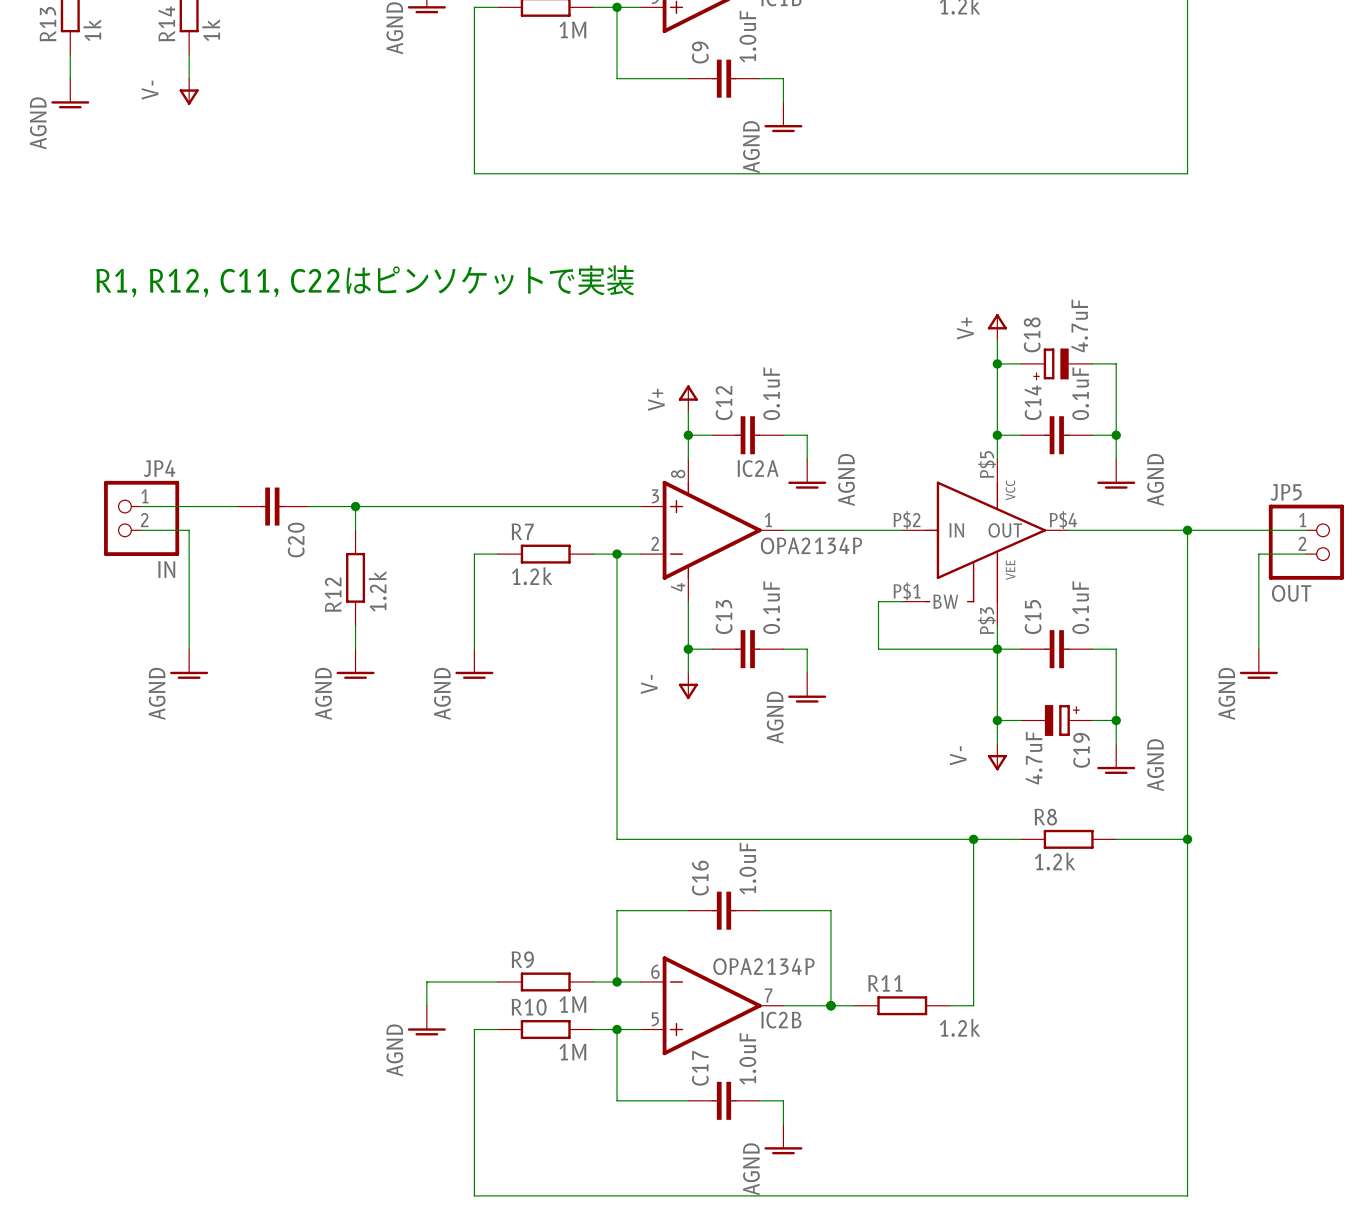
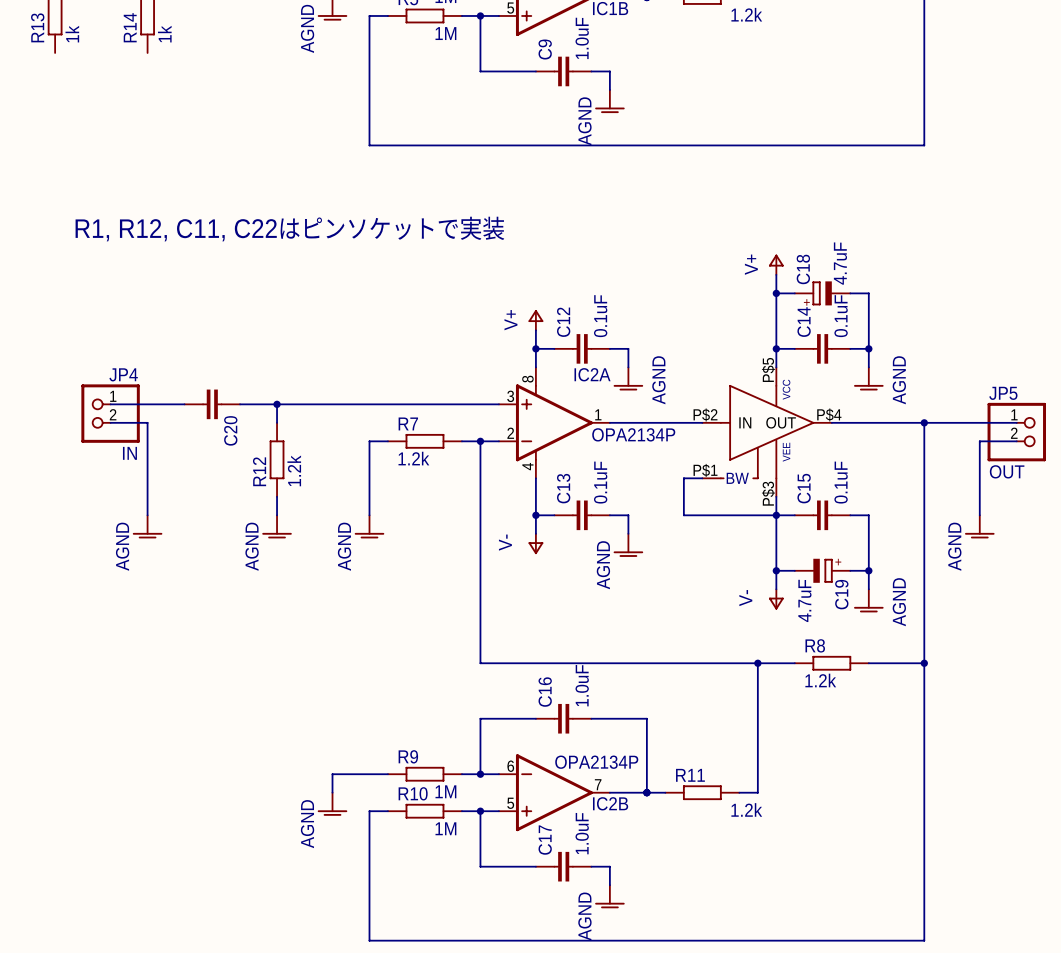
wire: (70, 54) (70, 78) -> none
wire: (189, 54) (189, 78) -> none
power symbol: V- (189, 91) -> none
power symbol: AGND (70, 93) -> none

